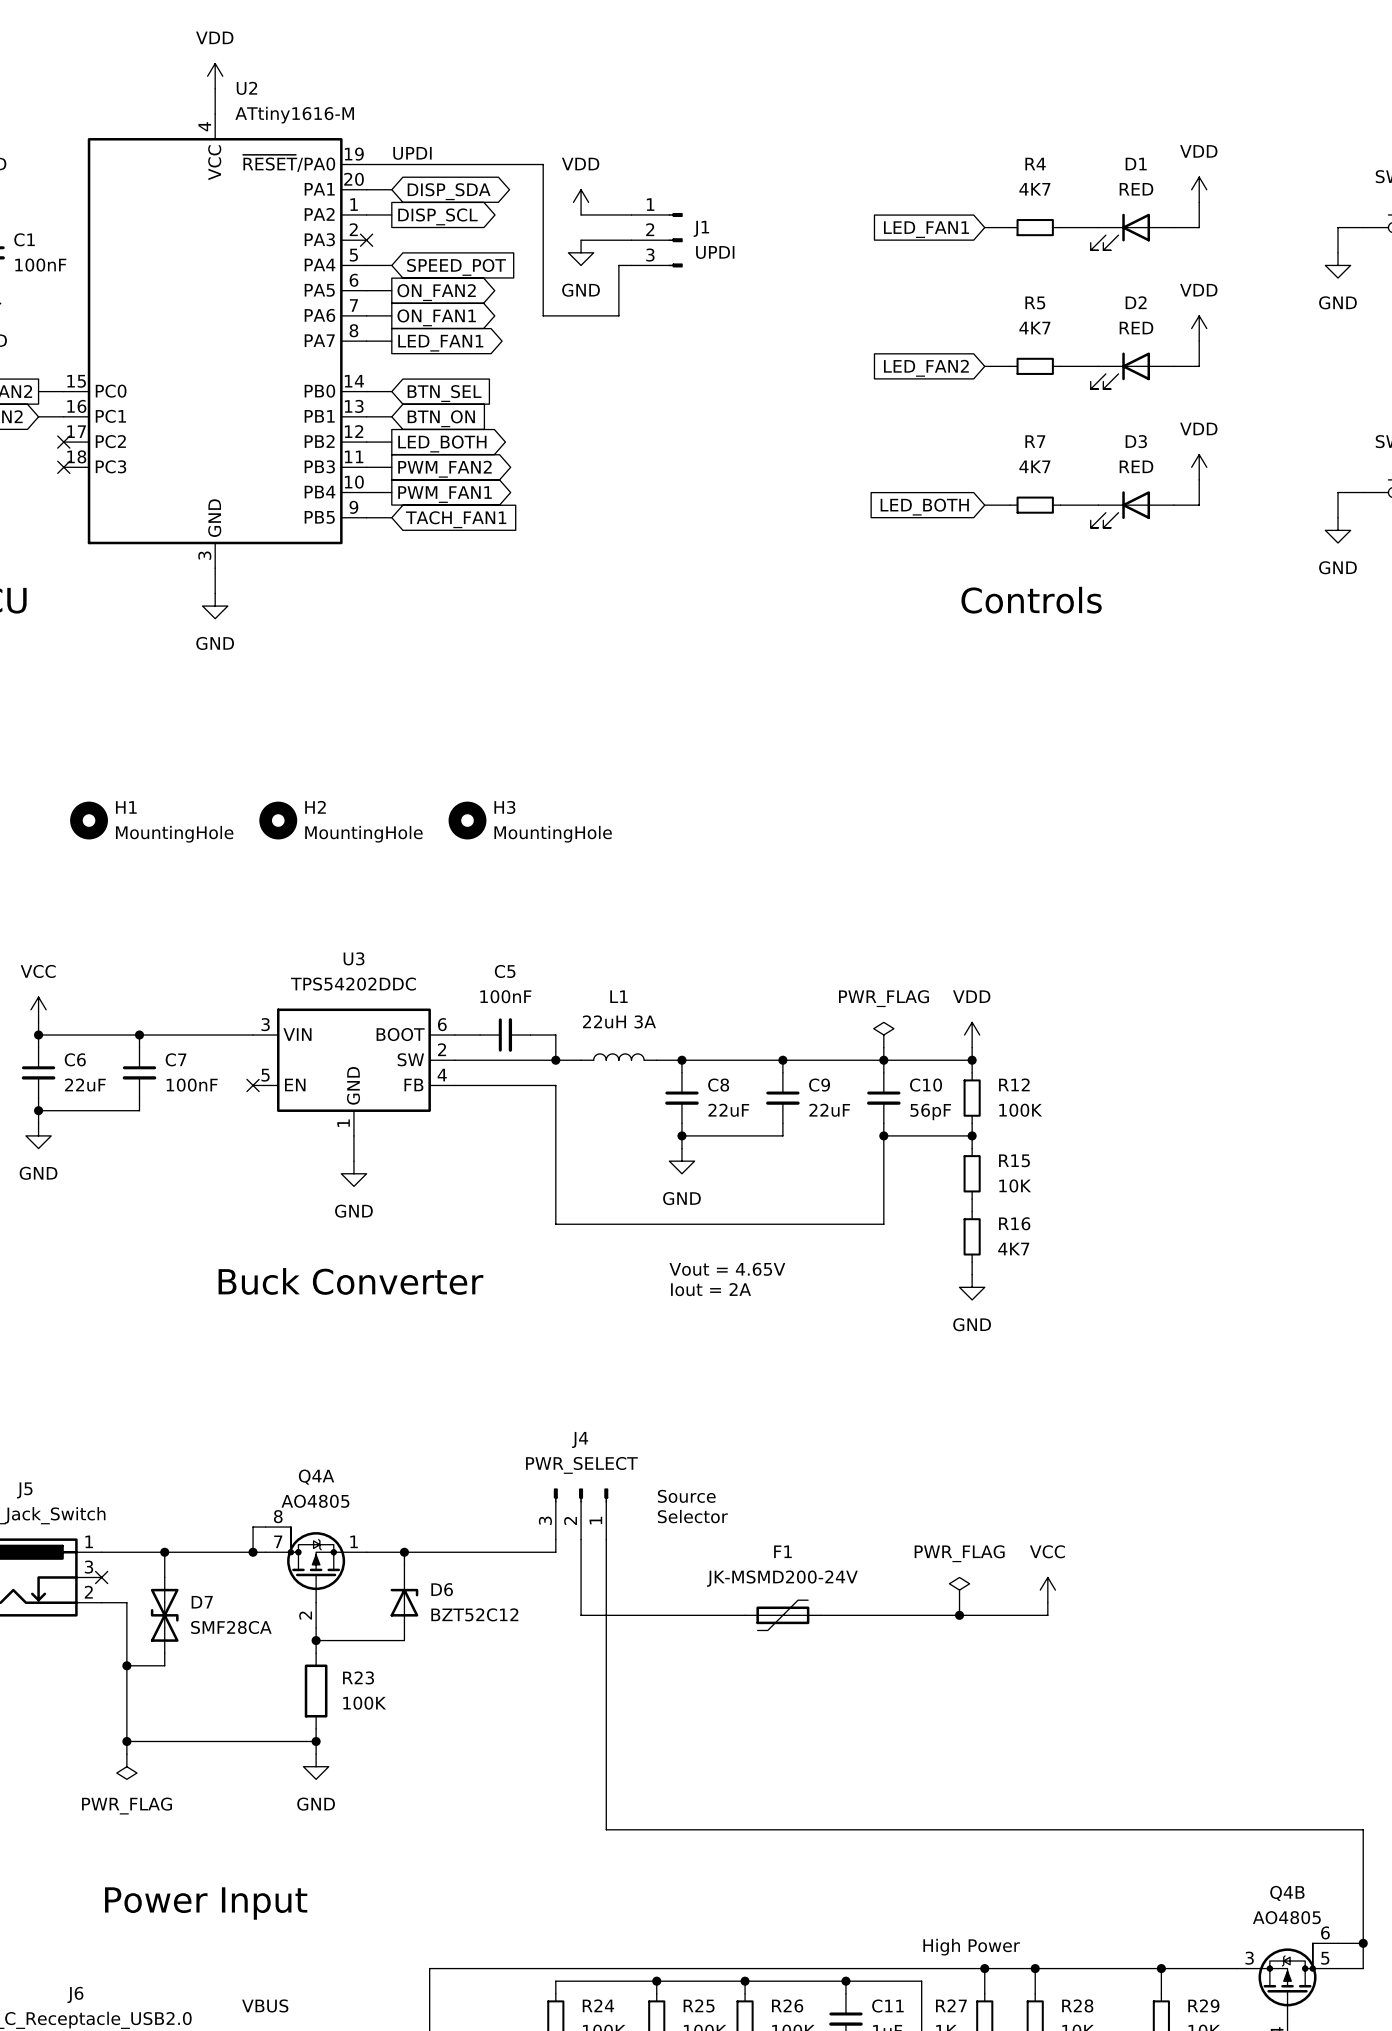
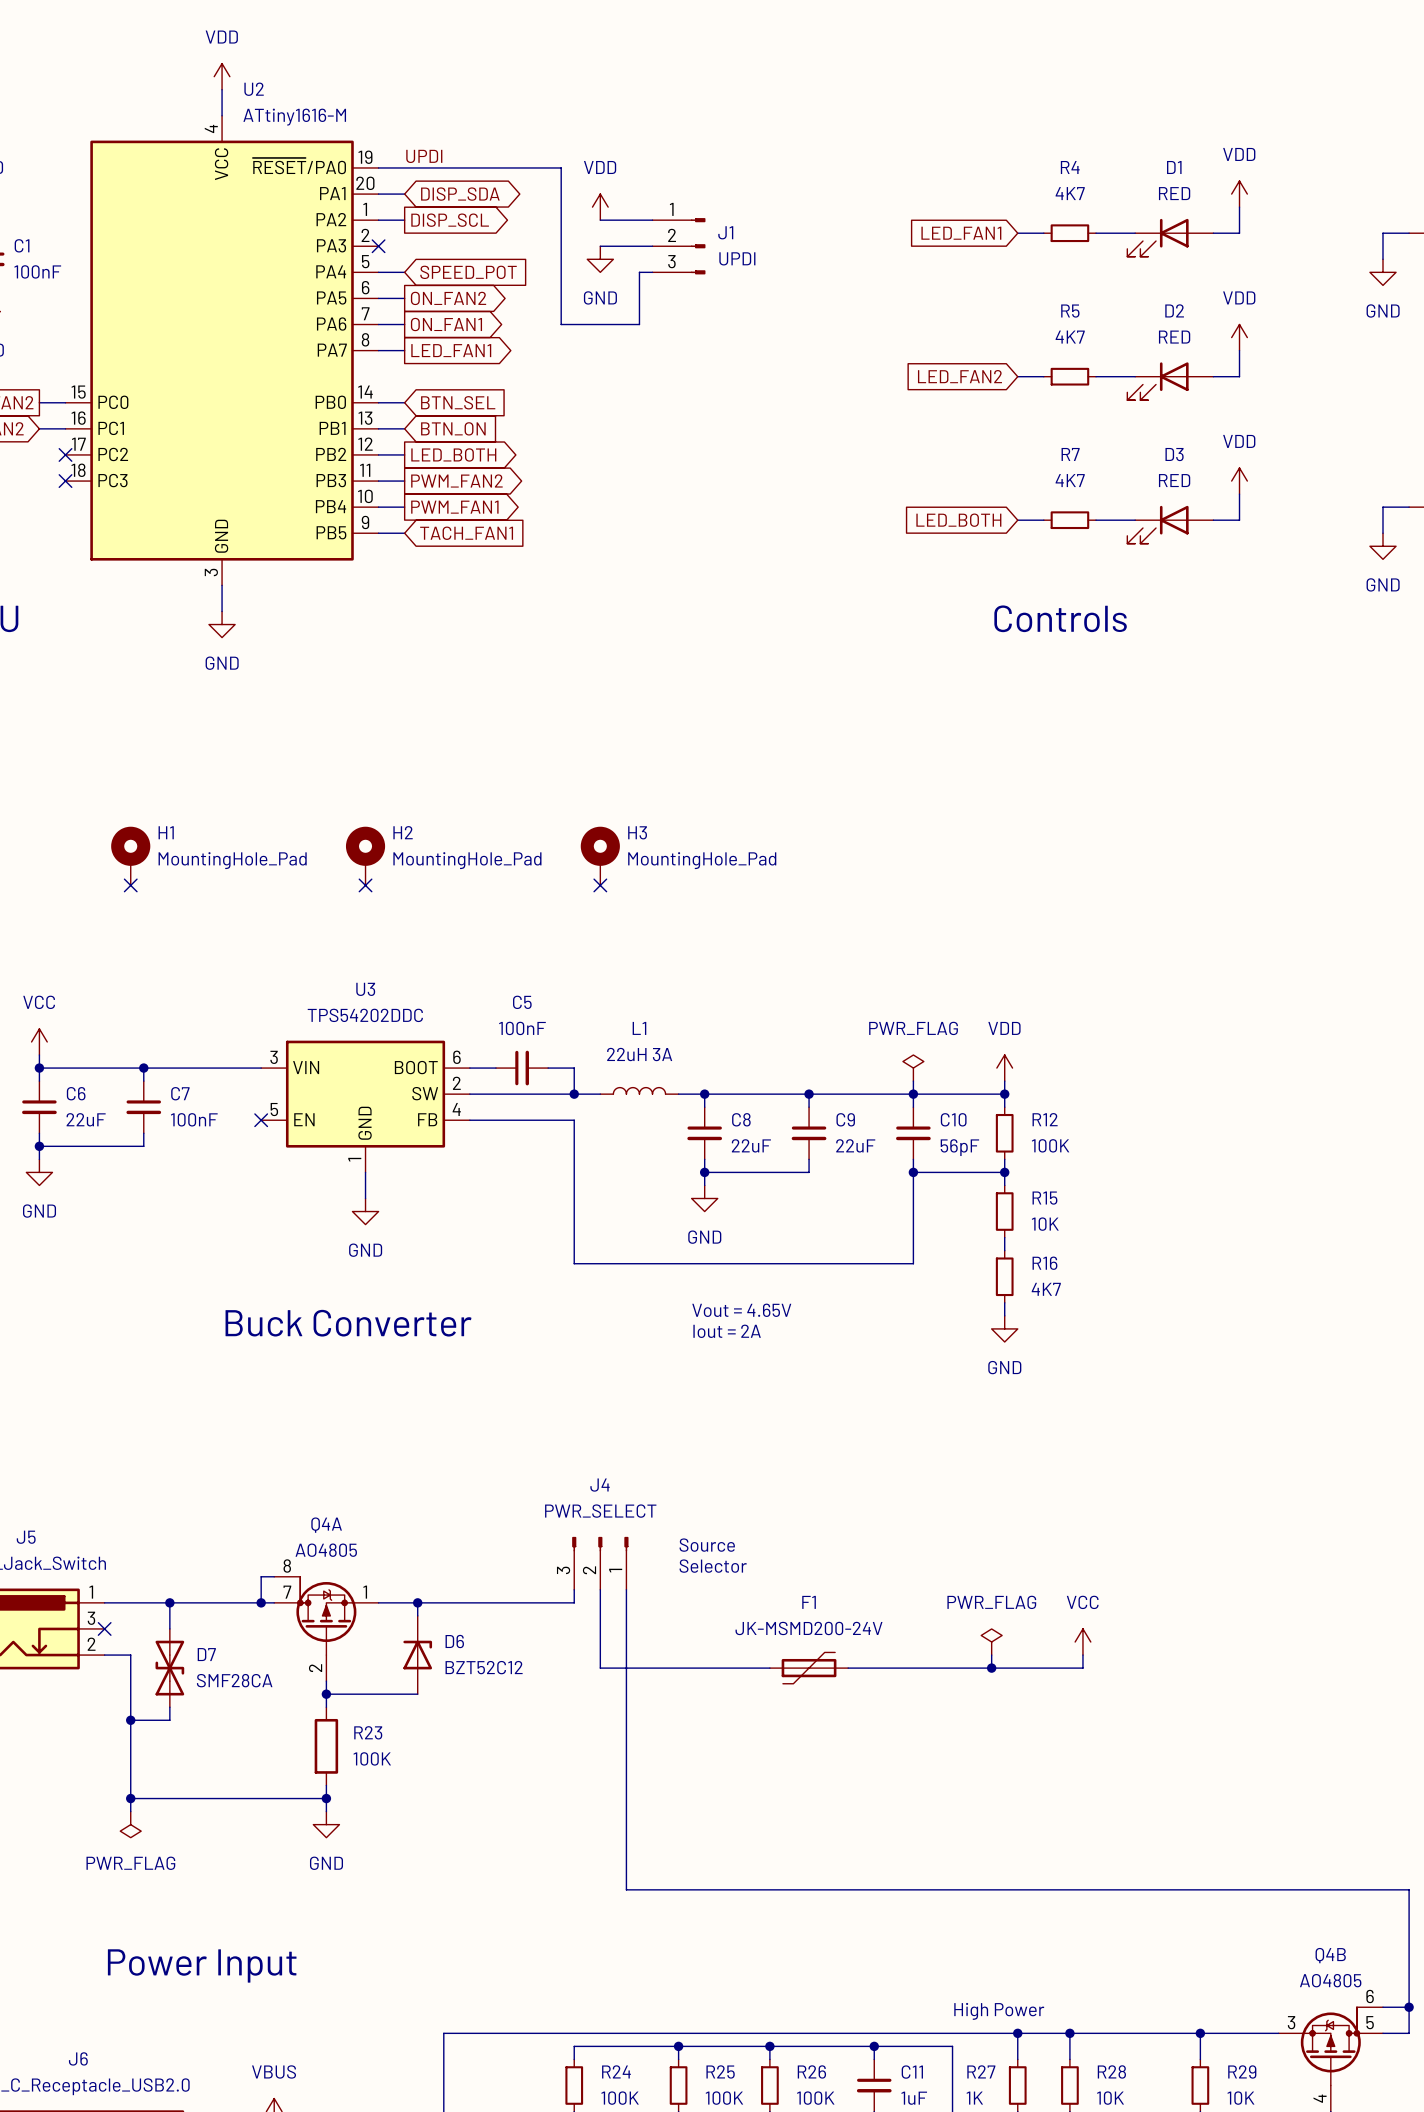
H1 symbol: [70, 801, 108, 840] -> [111, 826, 151, 886]
H2 symbol: [259, 801, 298, 840] -> [345, 826, 386, 886]
H3 symbol: [448, 801, 487, 840] -> [580, 826, 620, 886]
H1 value: MountingHole (174, 834) -> MountingHole_Pad (232, 860)
H2 value: MountingHole (363, 834) -> MountingHole_Pad (467, 860)
H3 value: MountingHole (553, 834) -> MountingHole_Pad (702, 860)
no-connect mark: none -> (130, 885)
no-connect mark: none -> (365, 885)
no-connect mark: none -> (600, 885)

